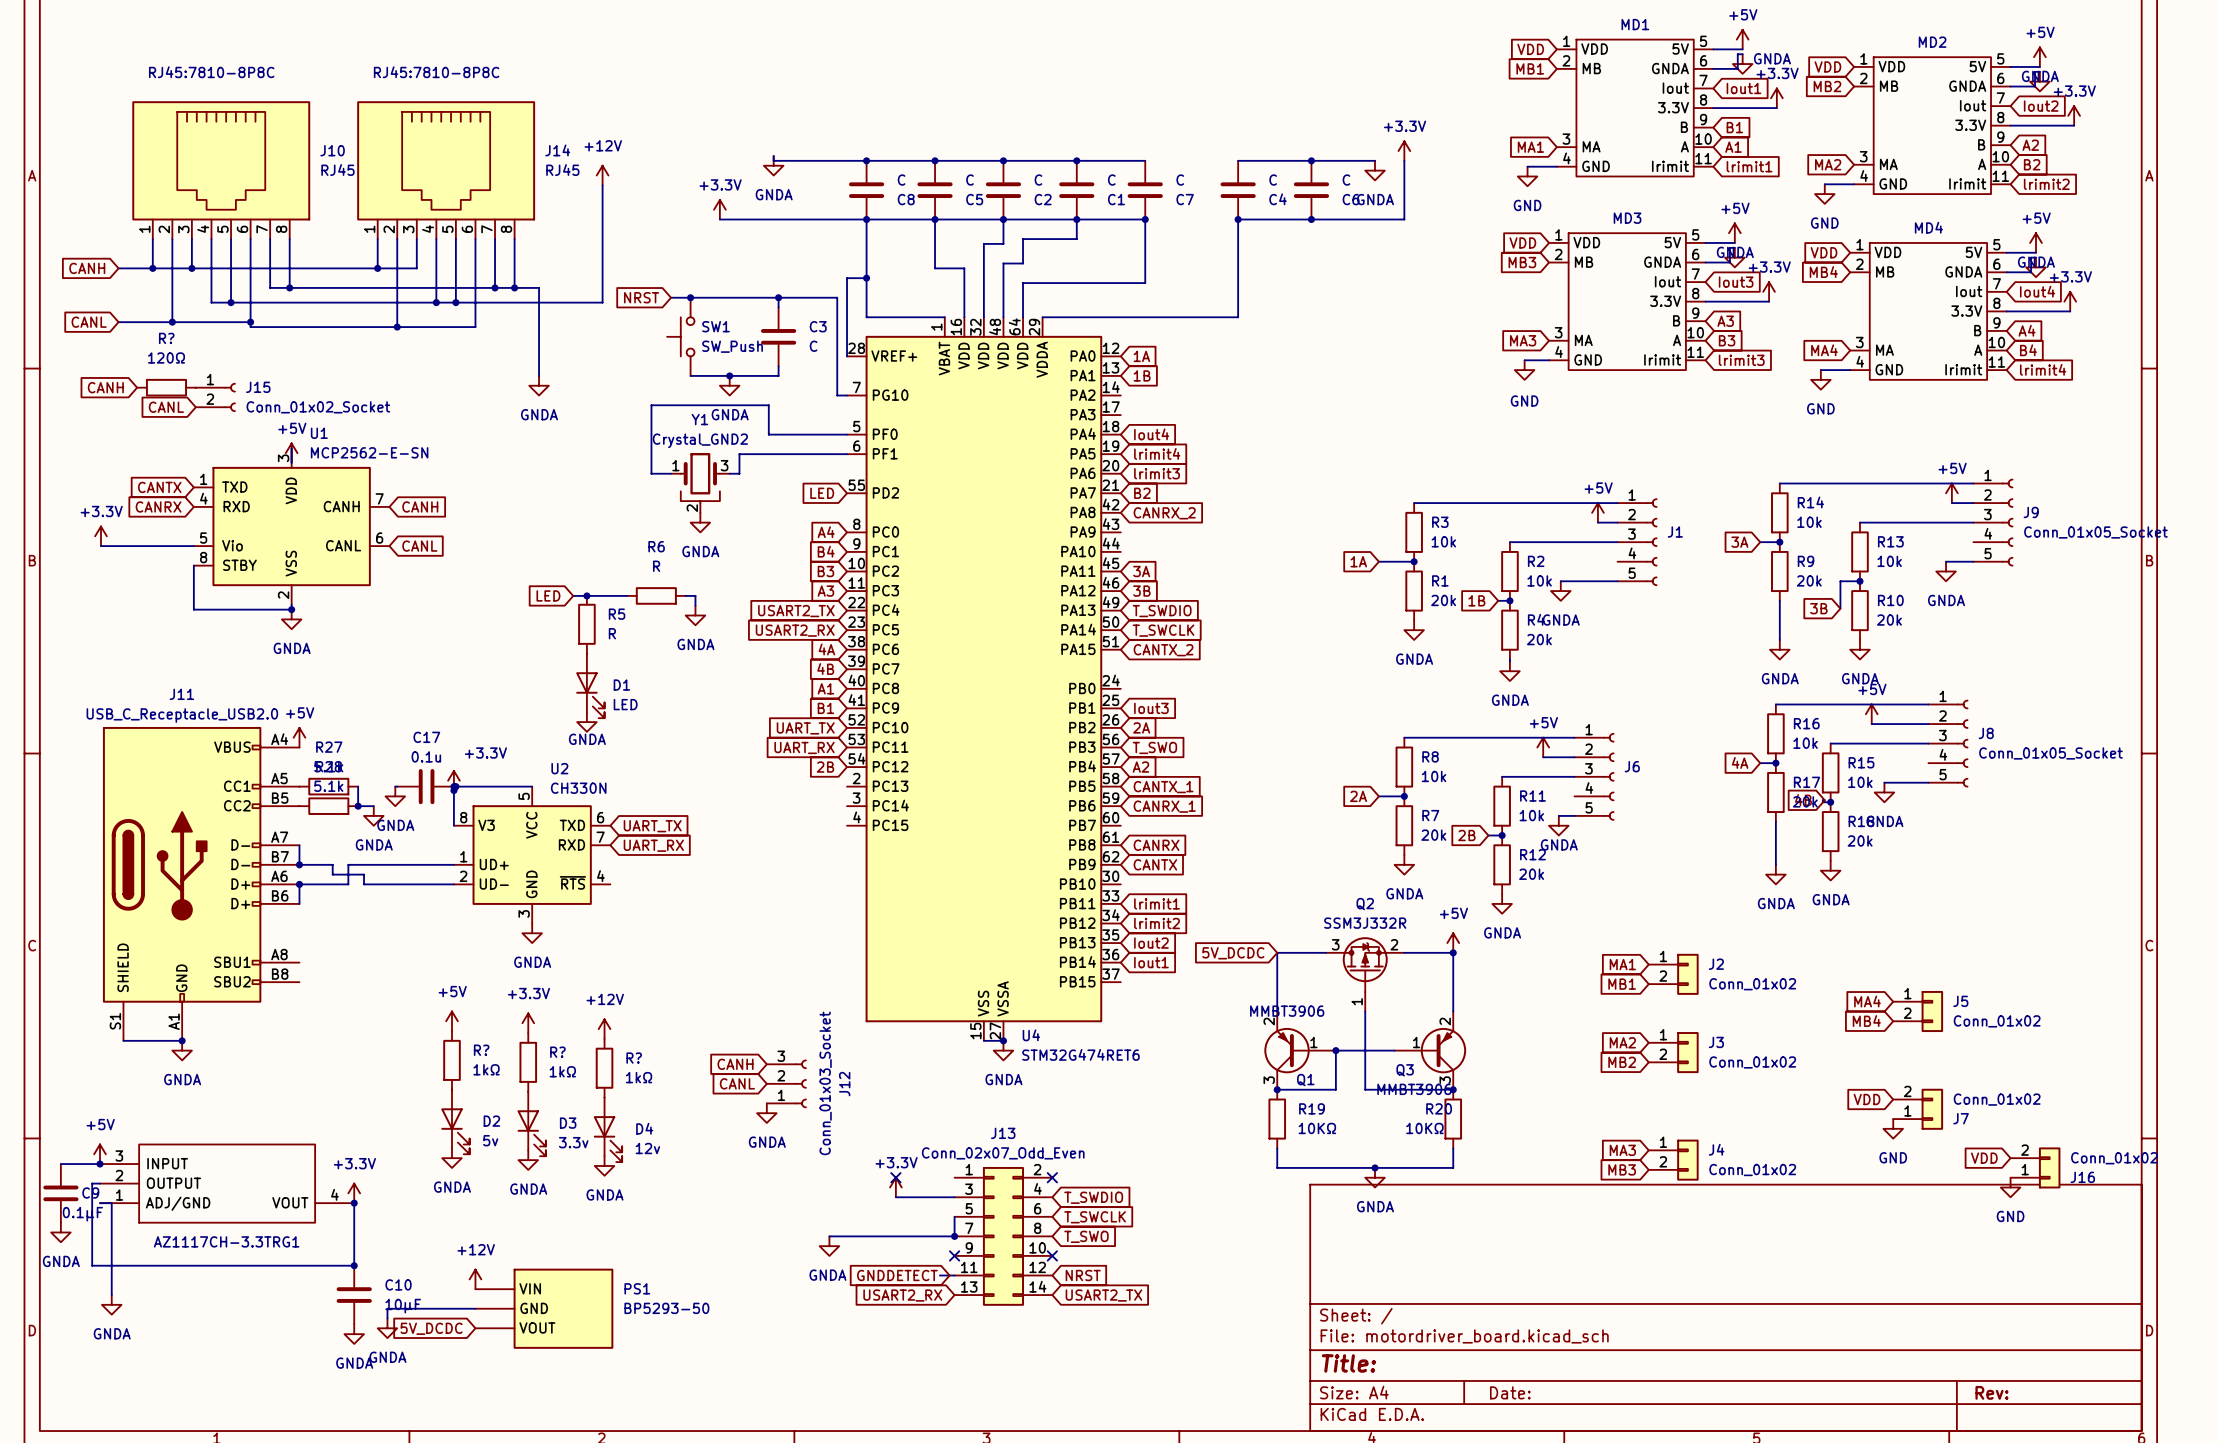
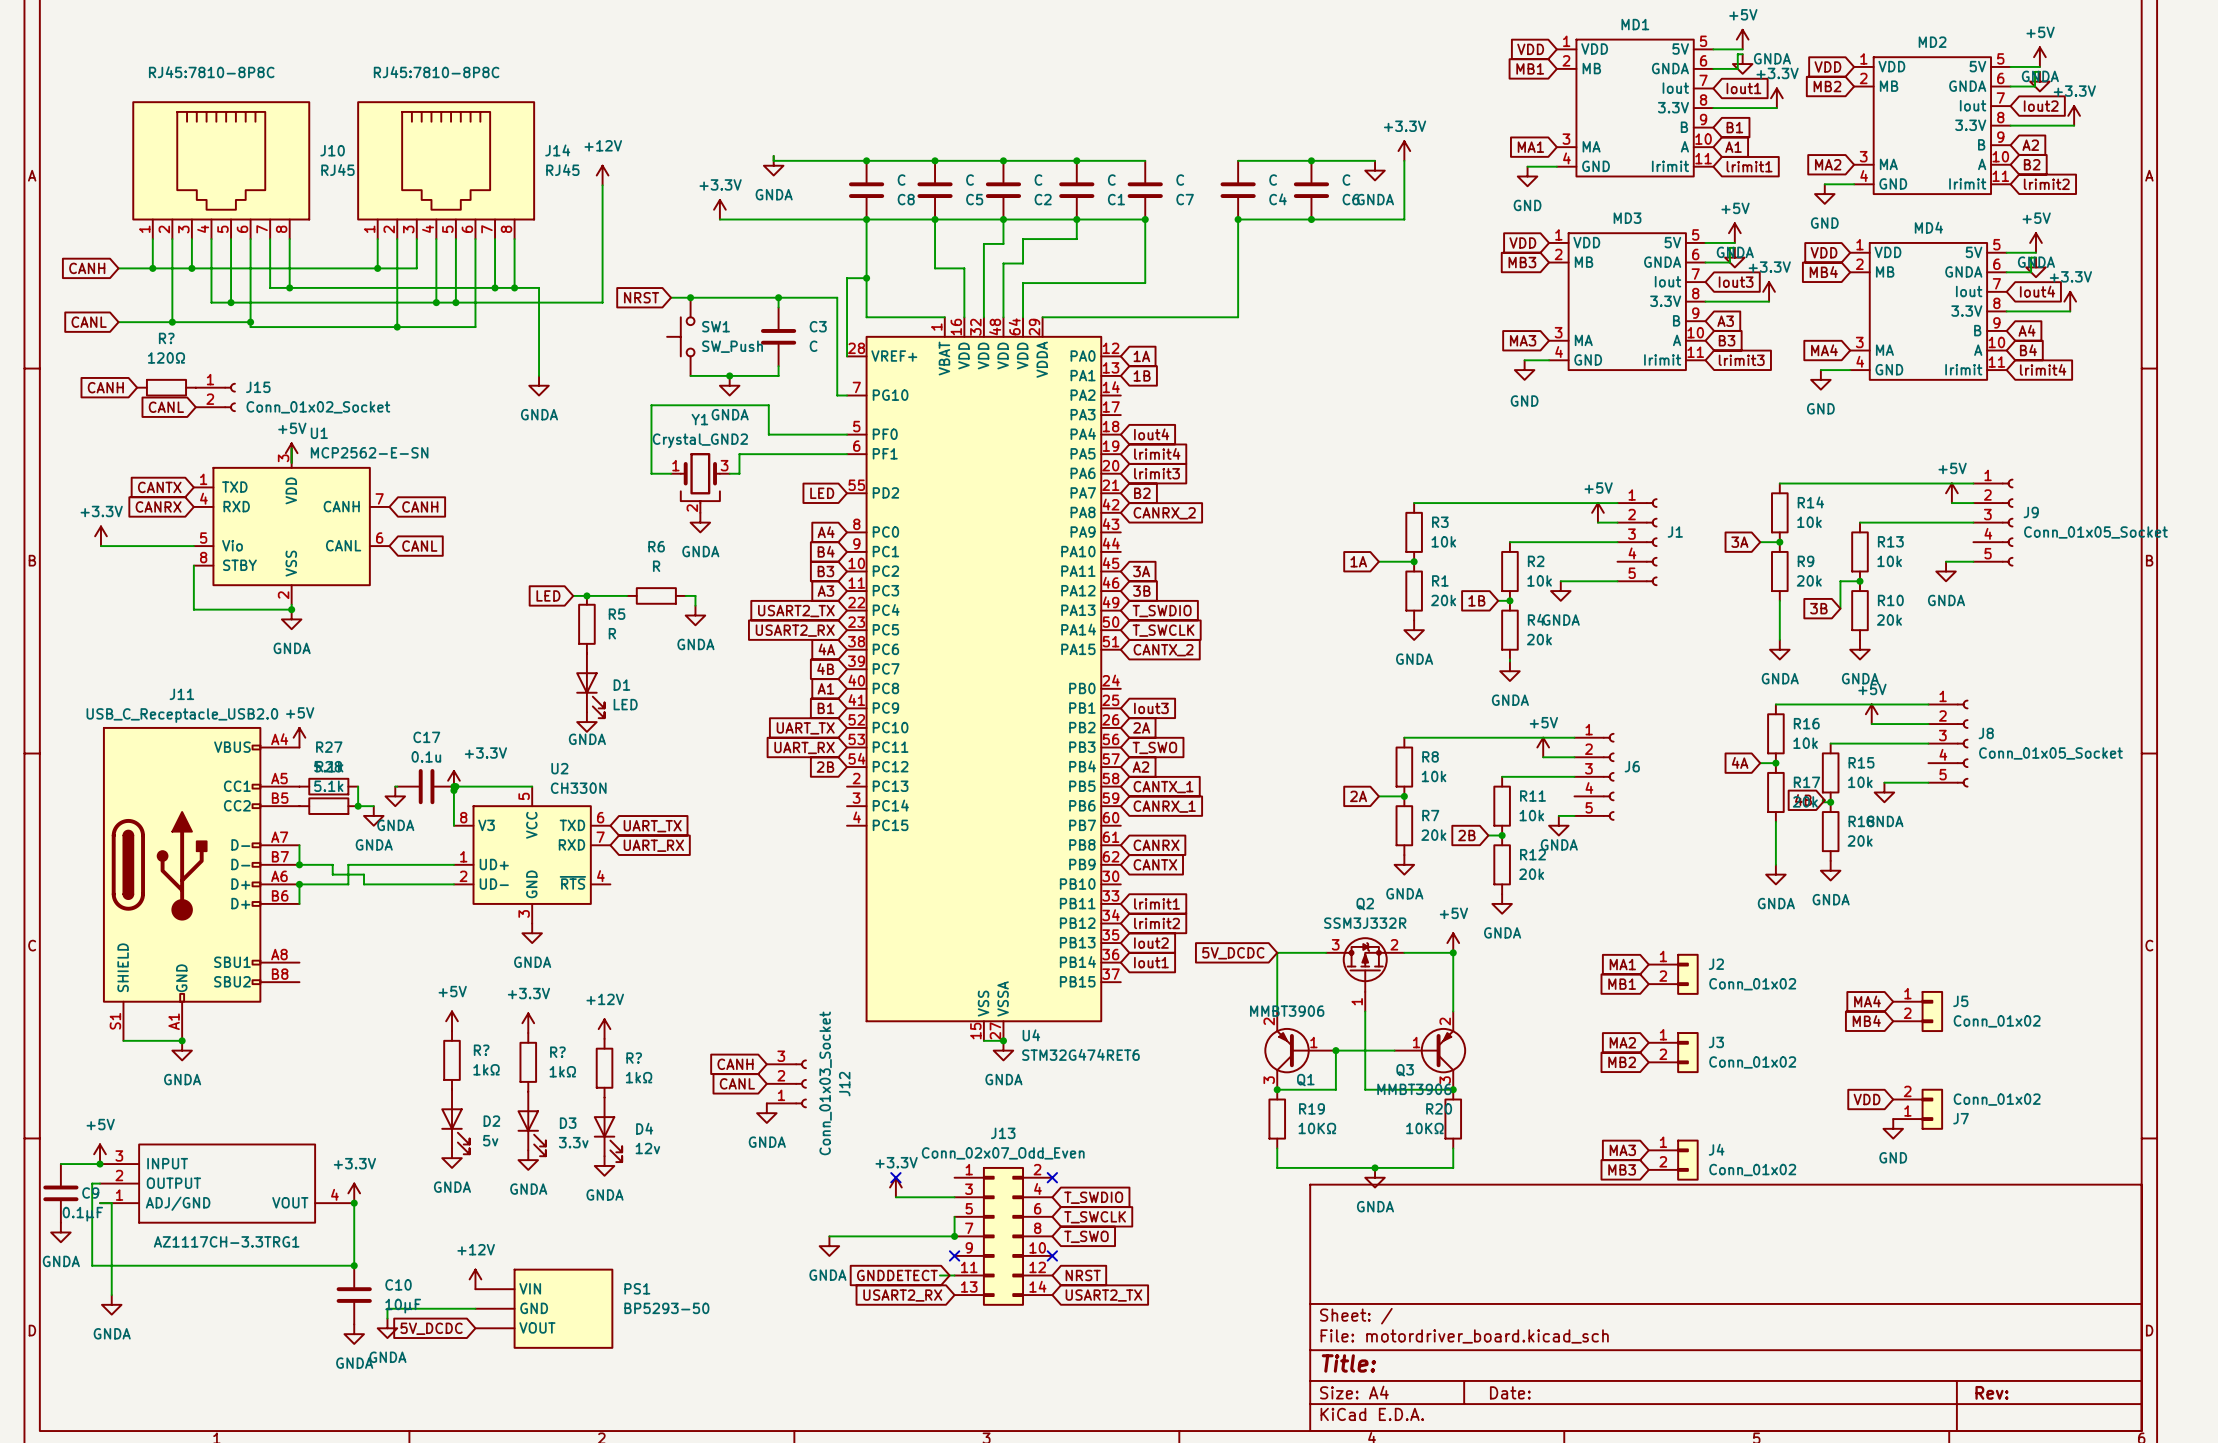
global label: VDD (1984, 1158) -> none
J16: Conn_01x02 (2035, 1167) -> none
power symbol: GND (2010, 1187) -> none

